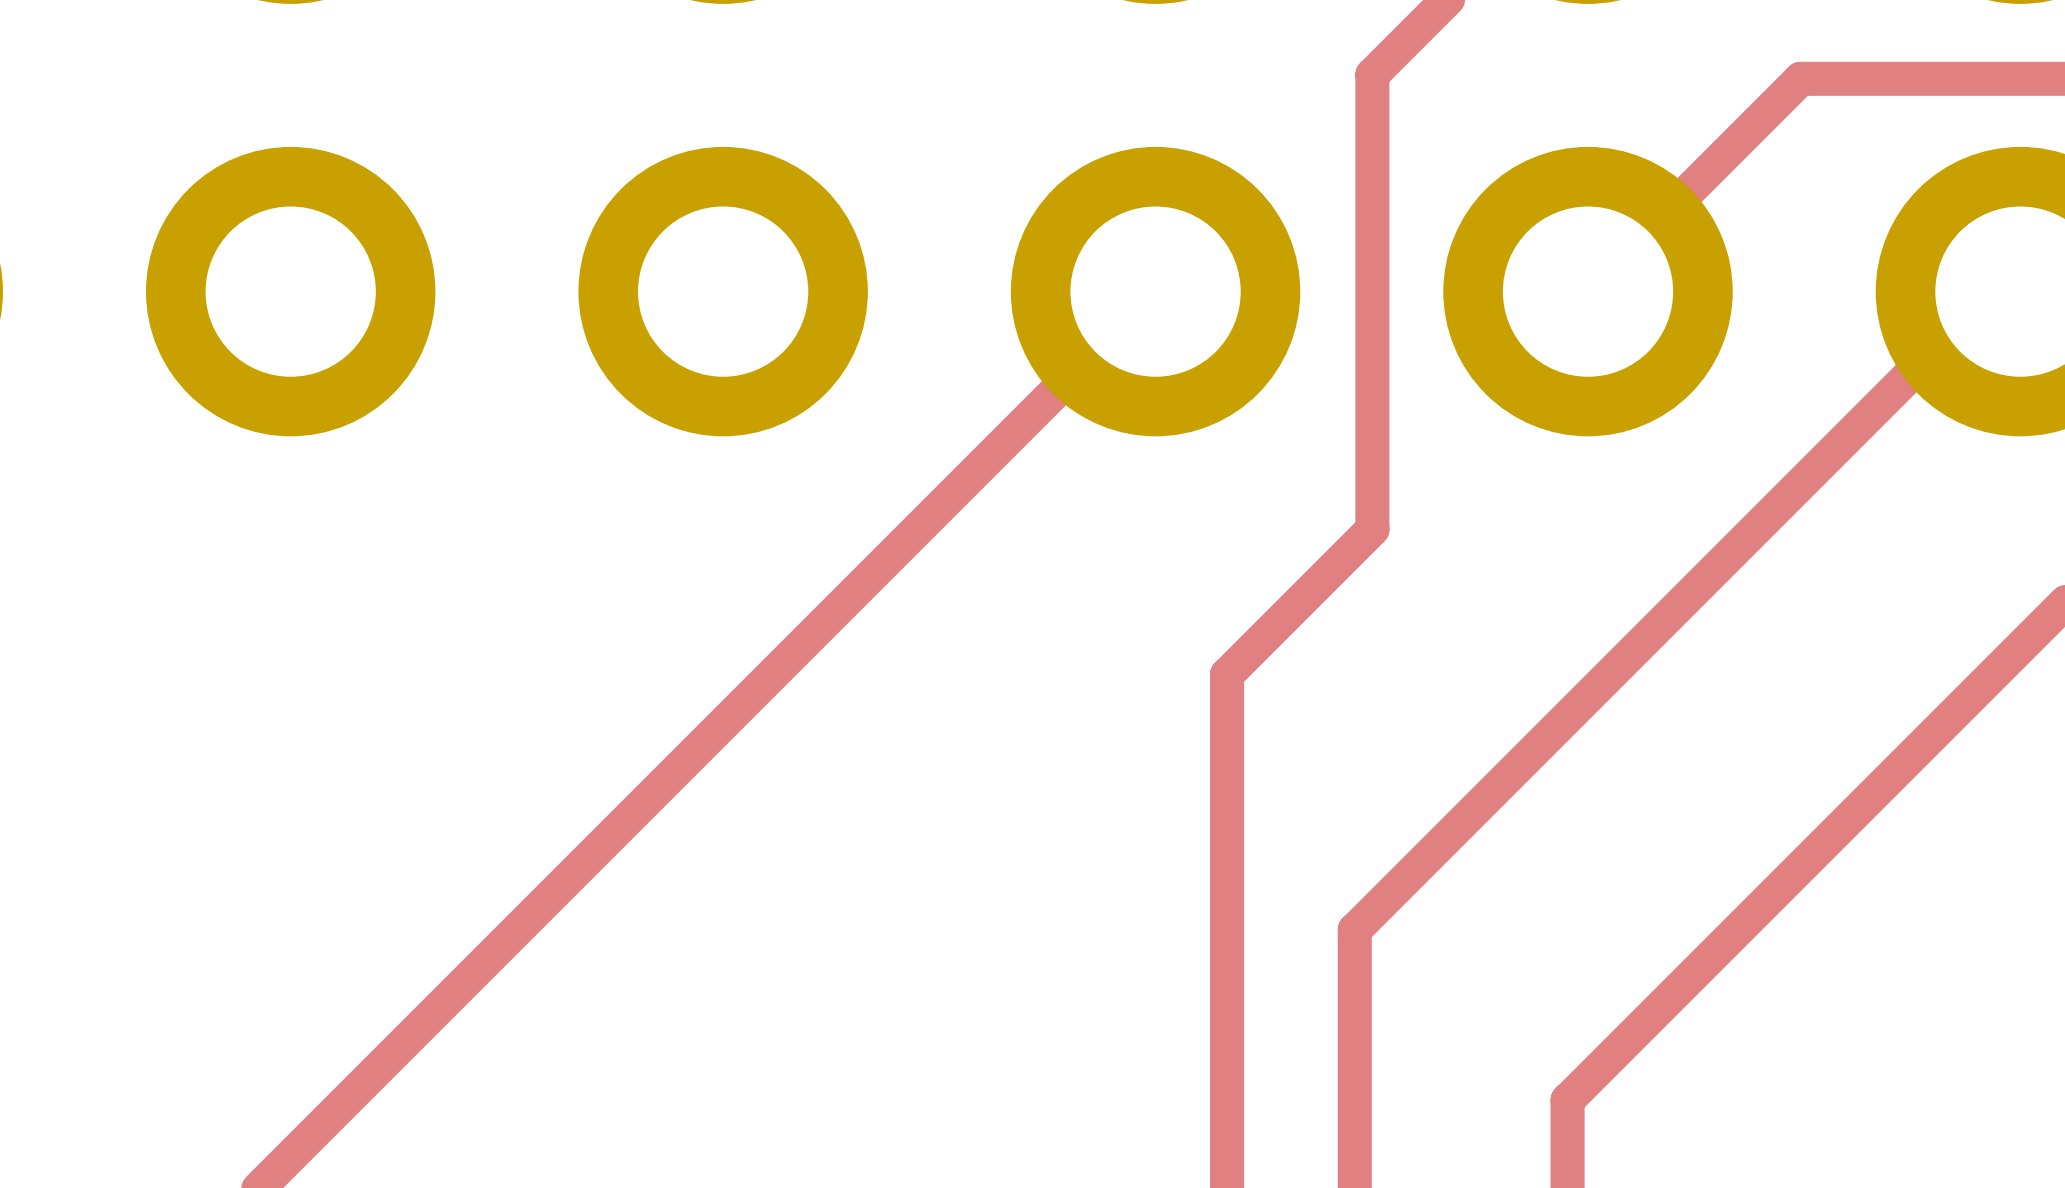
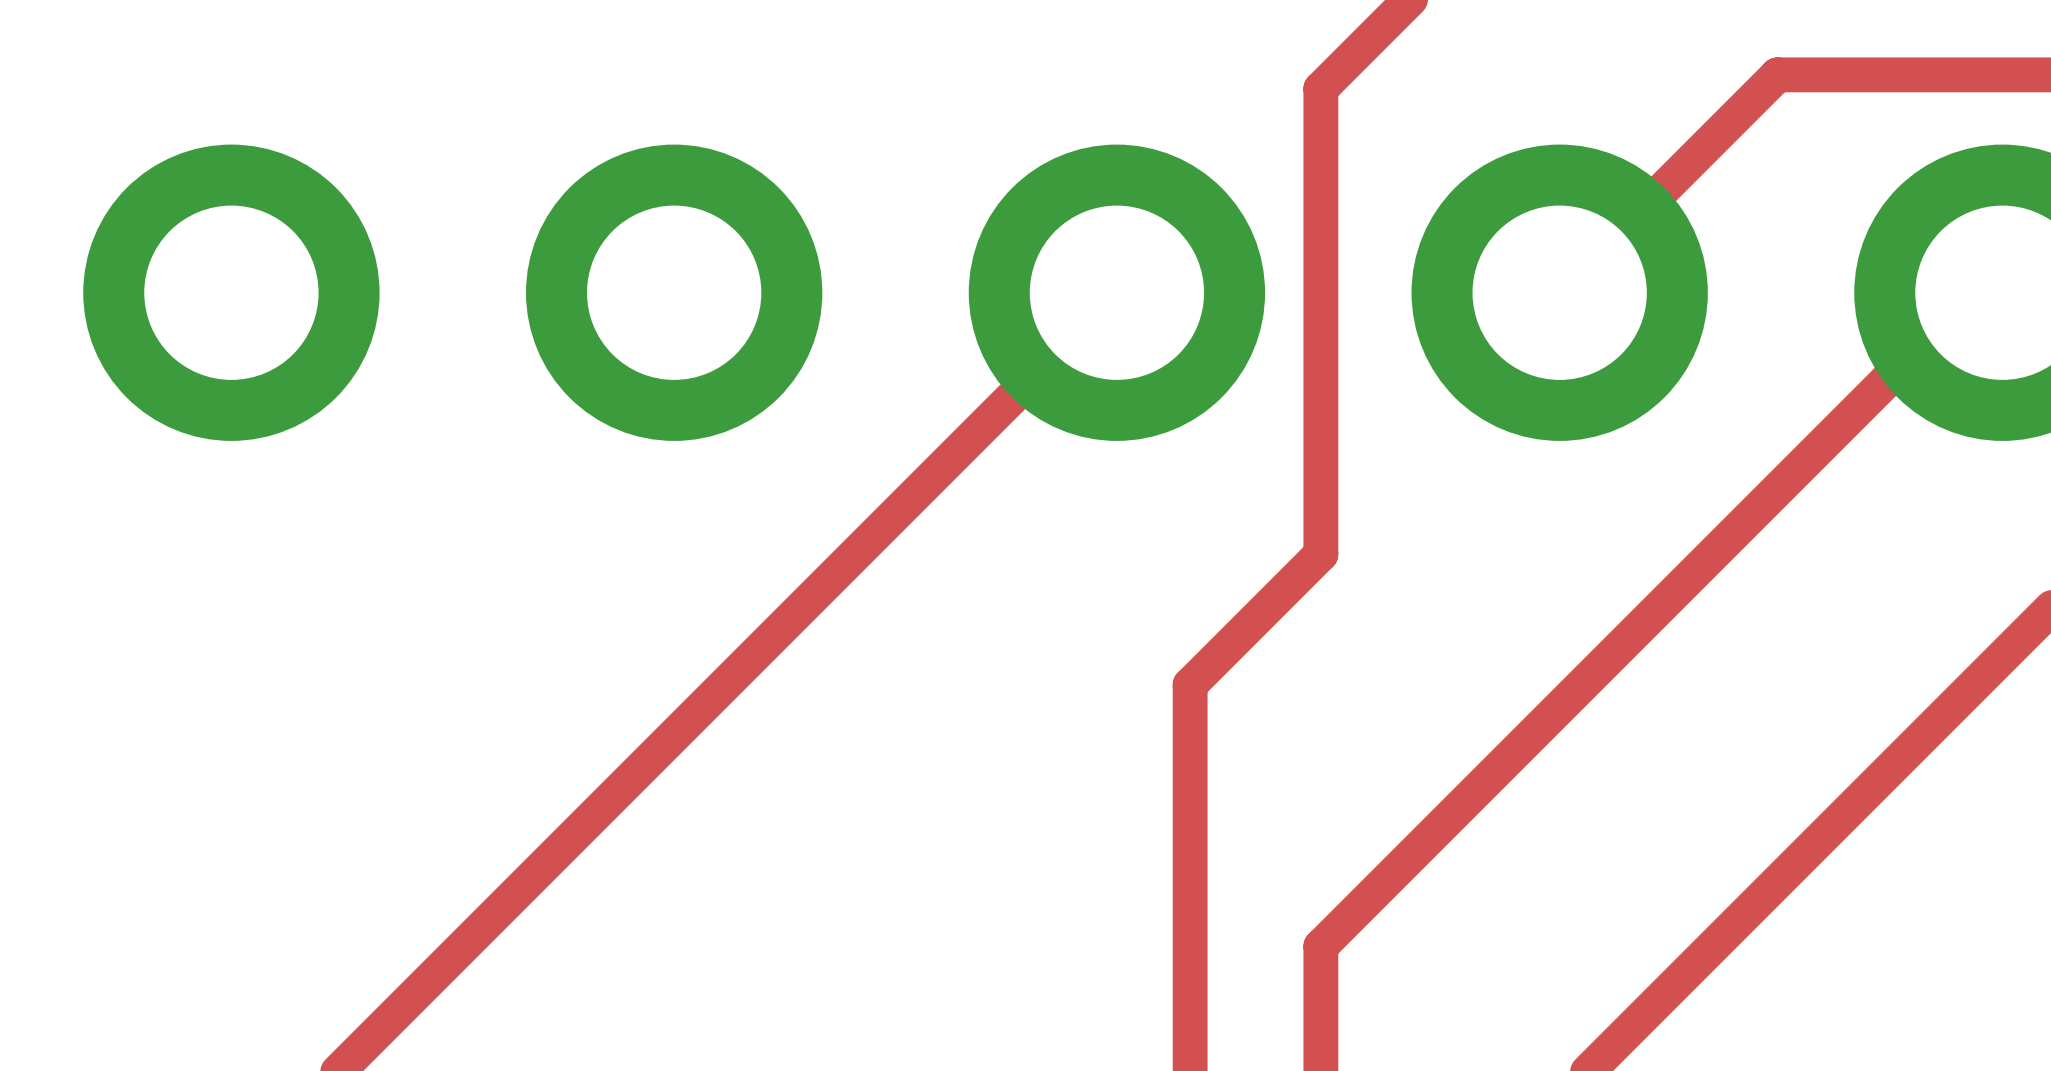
track: (1372, 74) (1372, 529) (1354, 546) -> (1338, 70) (1320, 88) (1320, 554)

